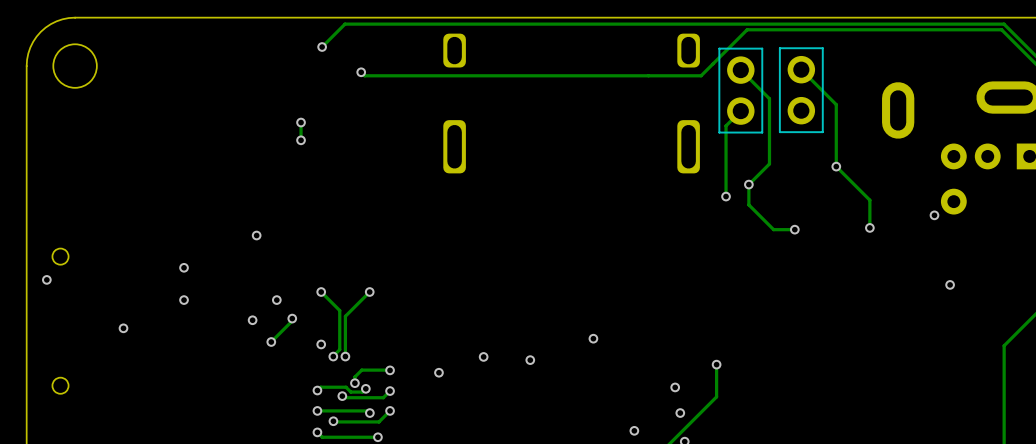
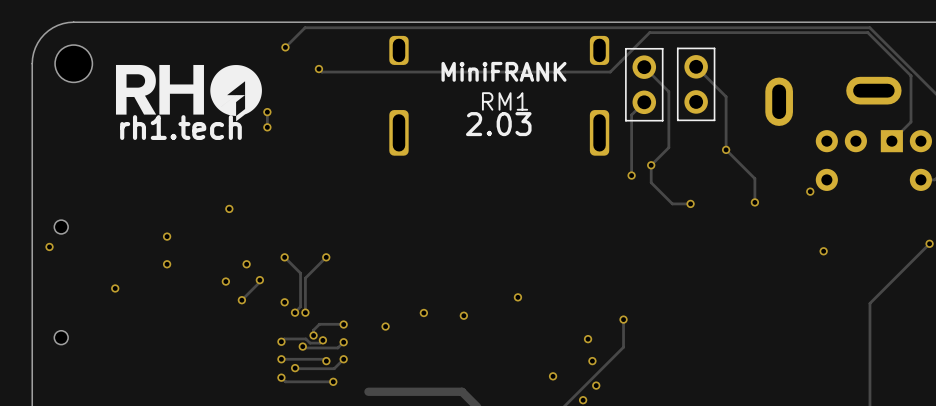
drawing: none -> [115, 64, 262, 122]
text: none -> MiniFRANK (503, 71)
text: none -> RM1 (505, 101)
text: none -> 2.03 (498, 124)
text: none -> rh1.tech (180, 127)

